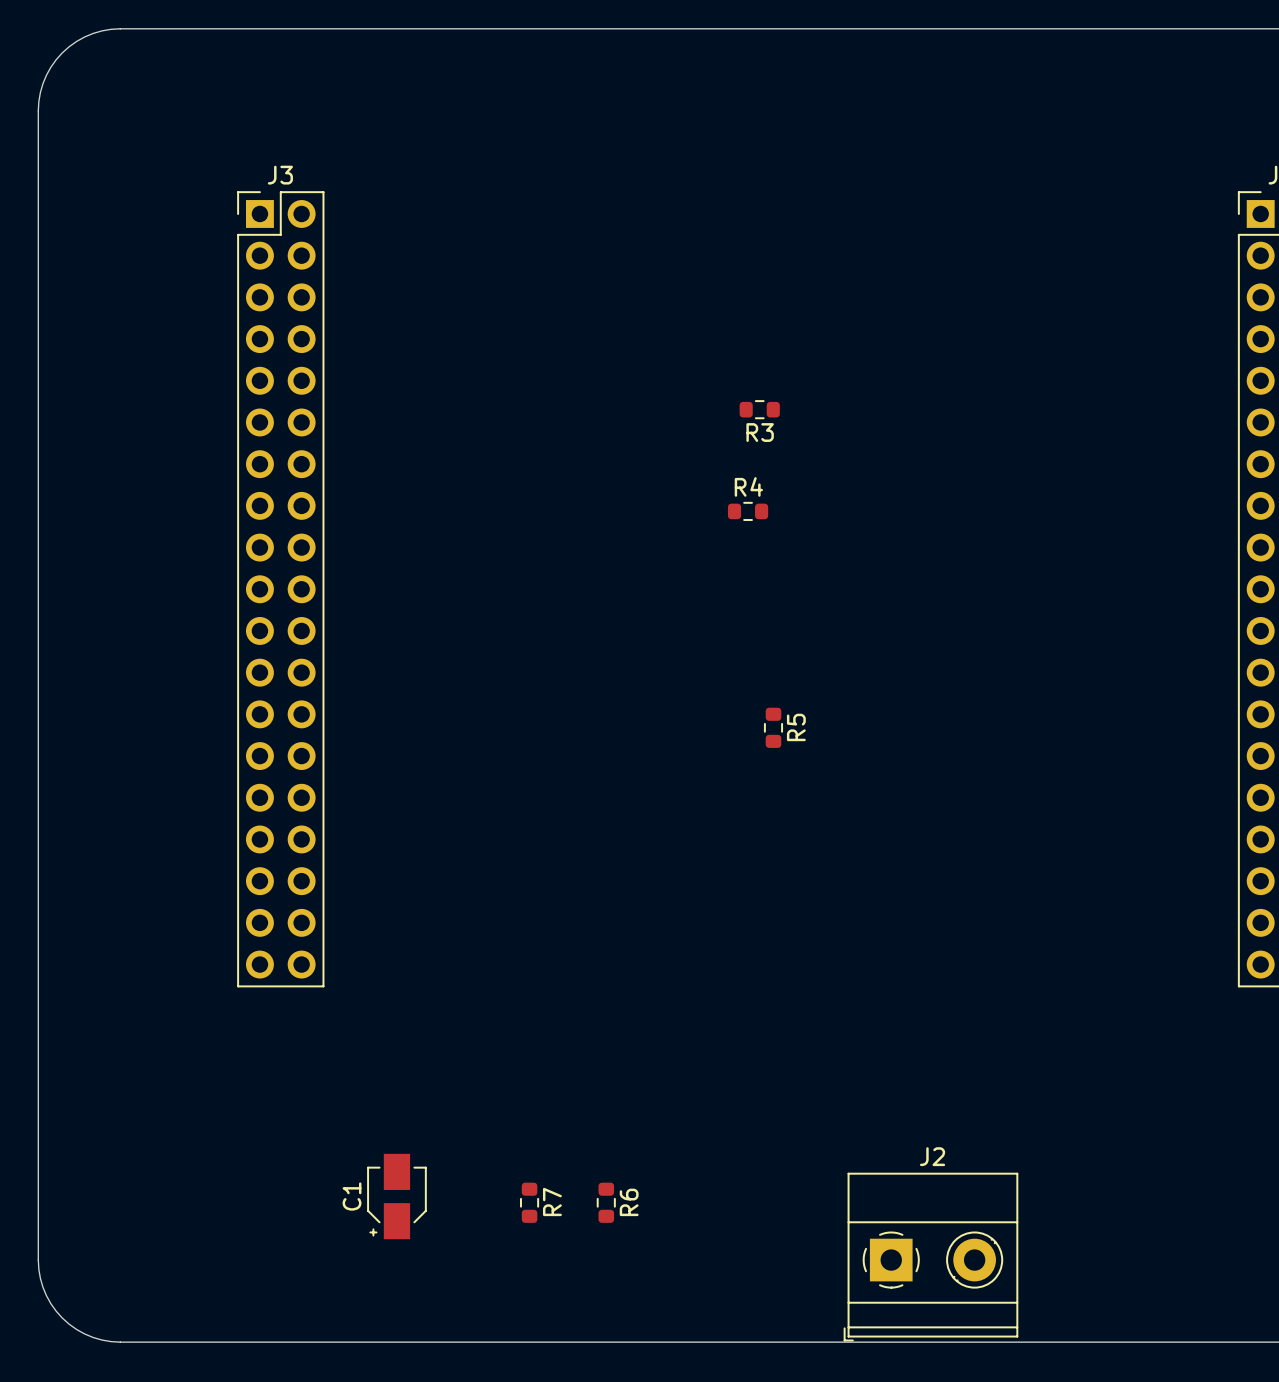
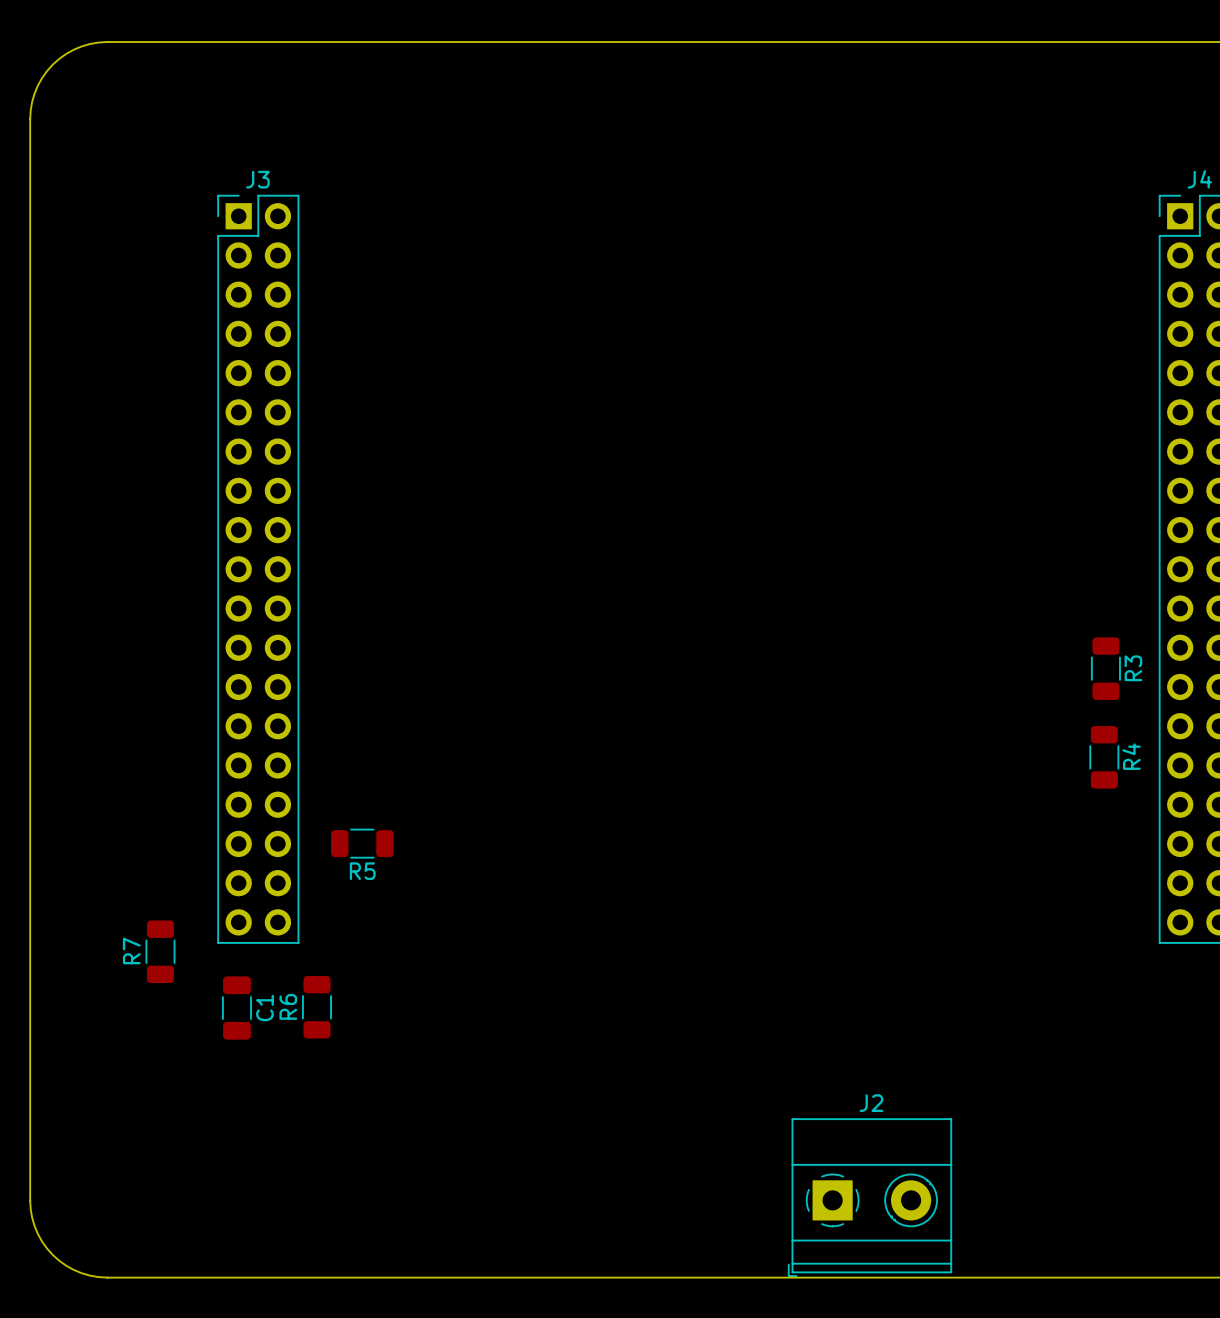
R3 footprint: [739, 400, 780, 420] -> [1090, 637, 1121, 700]
R3 name position: R3 (760, 432) -> R3 (1133, 668)
R4 name position: R4 (748, 486) -> R4 (1131, 756)
R4 footprint: [727, 501, 769, 521] -> [1089, 726, 1120, 789]
R5 footprint: [763, 707, 784, 748] -> [331, 828, 394, 859]
R5 name position: R5 (796, 727) -> R5 (362, 871)
C1 footprint: [367, 1153, 427, 1240] -> [221, 976, 252, 1040]
R7 footprint: [519, 1182, 540, 1223] -> [145, 920, 176, 984]
R6 footprint: [596, 1182, 616, 1223] -> [302, 975, 332, 1039]
C1 name position: C1 (352, 1196) -> C1 (264, 1008)
R7 name position: R7 (552, 1201) -> R7 (131, 951)
R6 name position: R6 (629, 1202) -> R6 (288, 1006)

